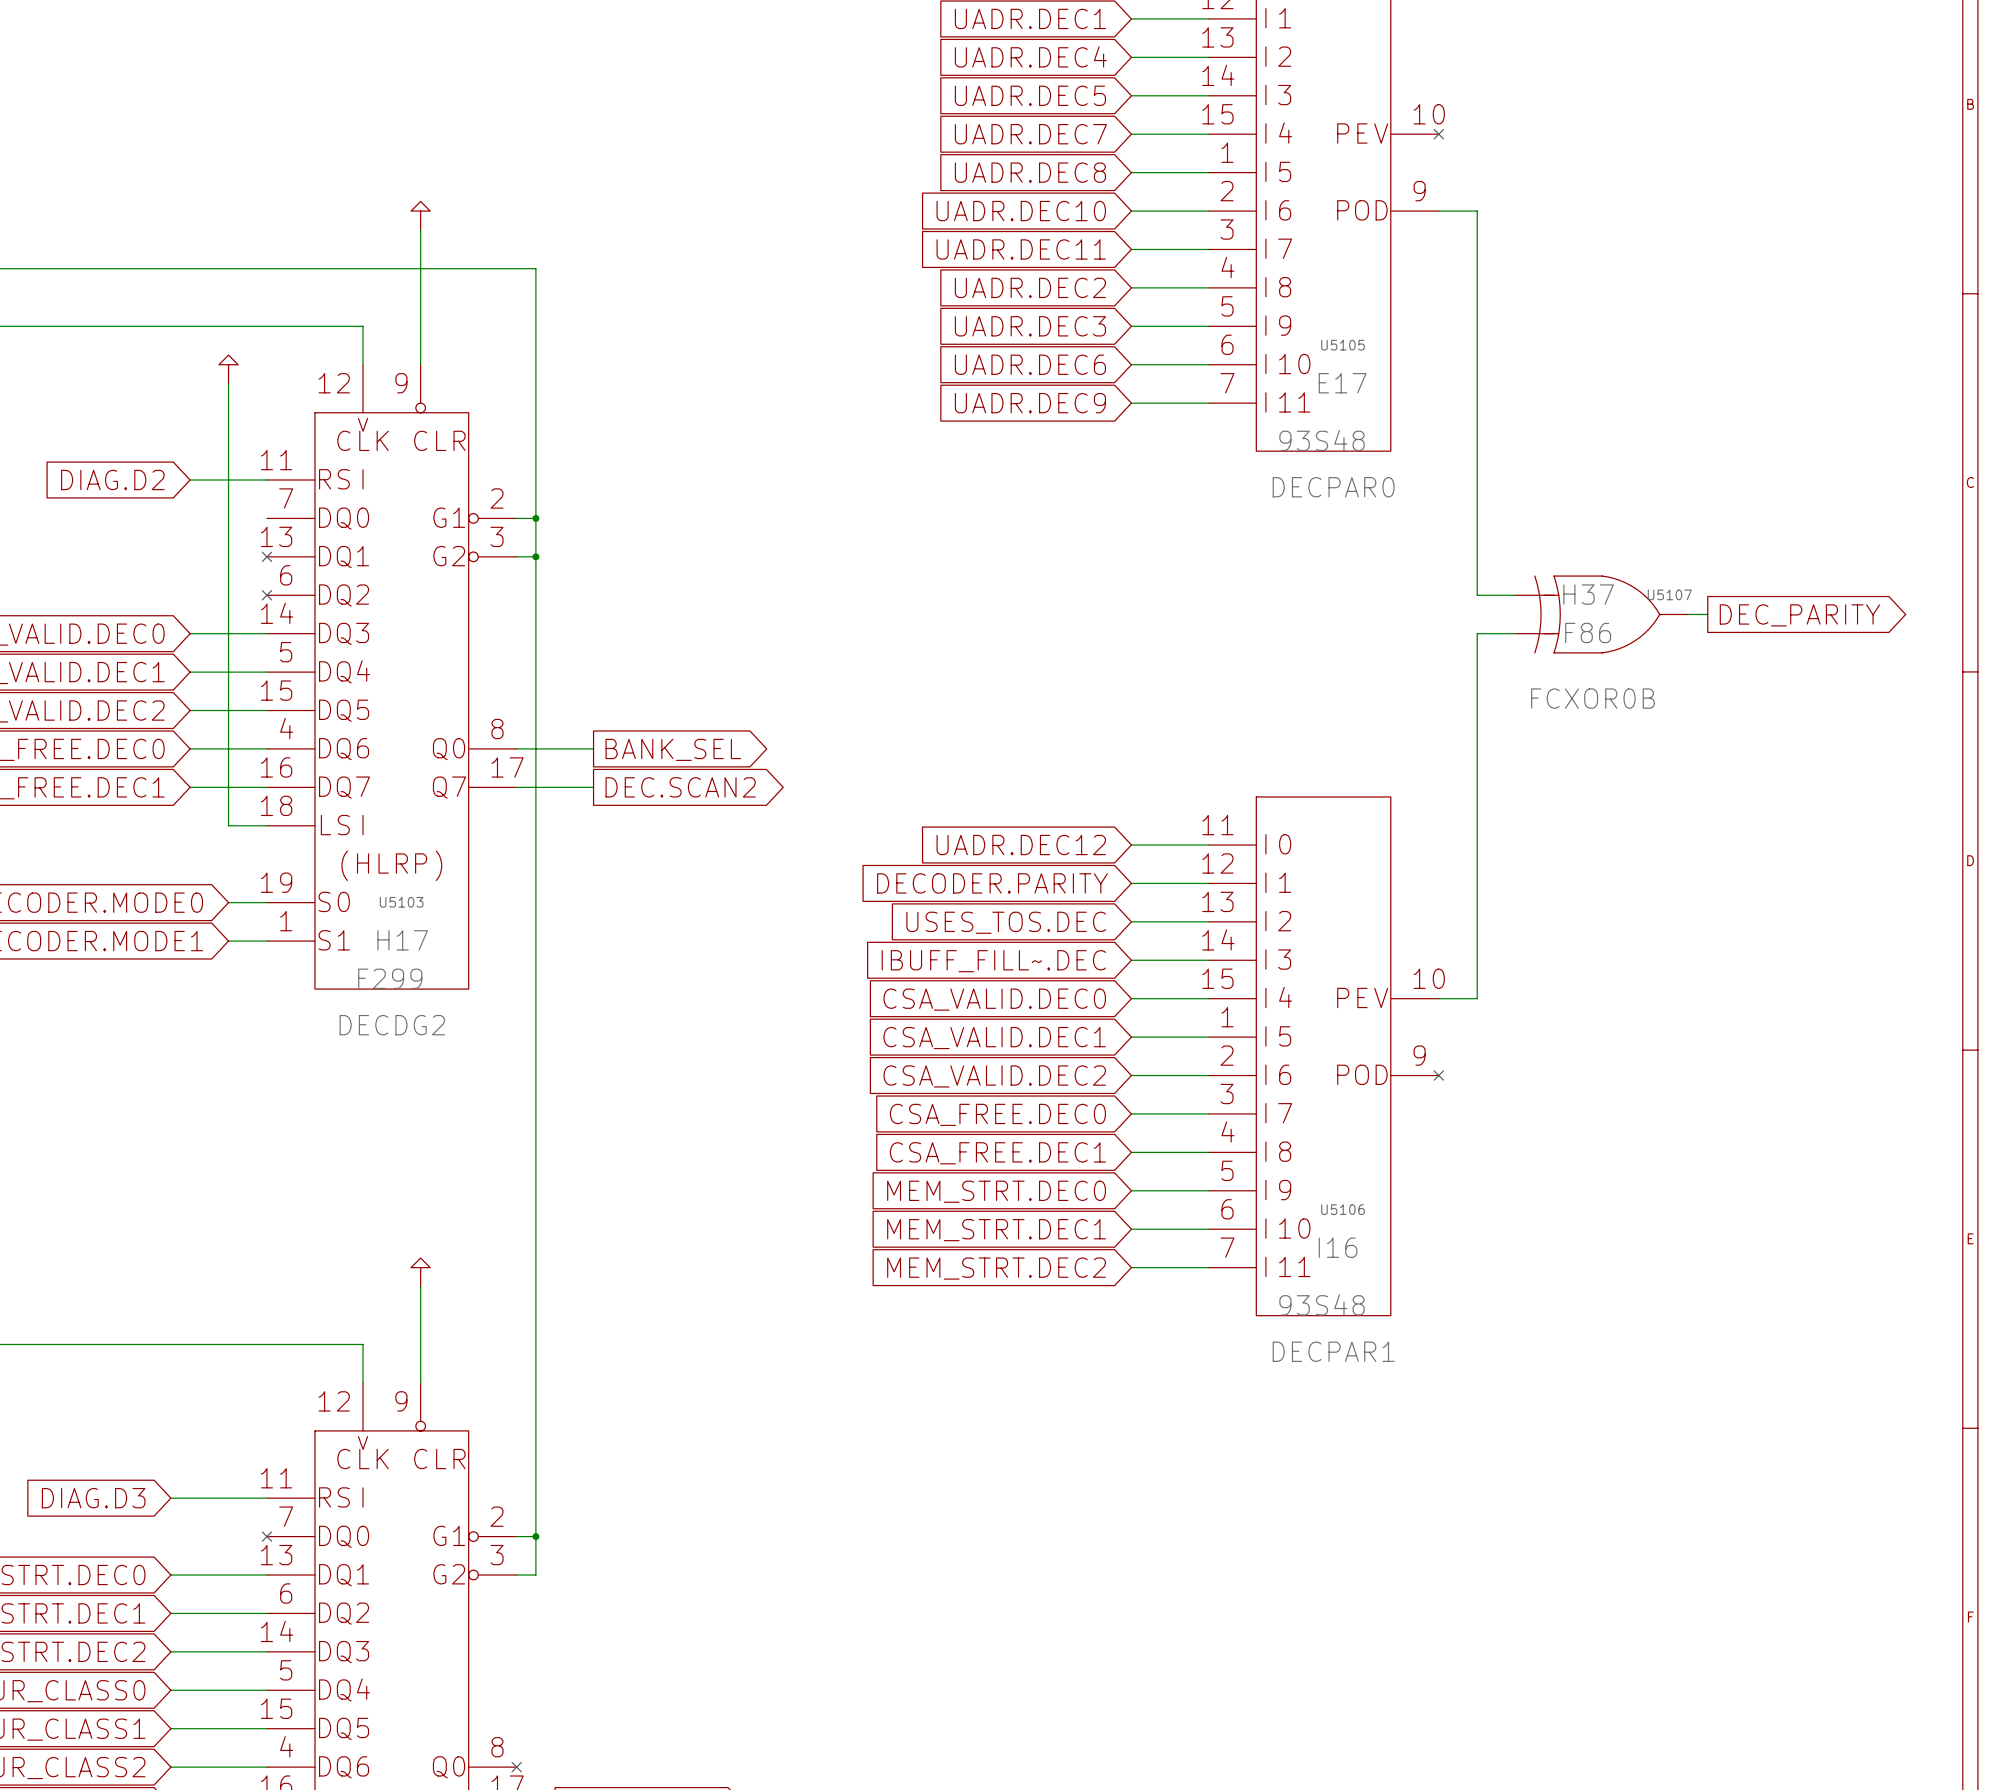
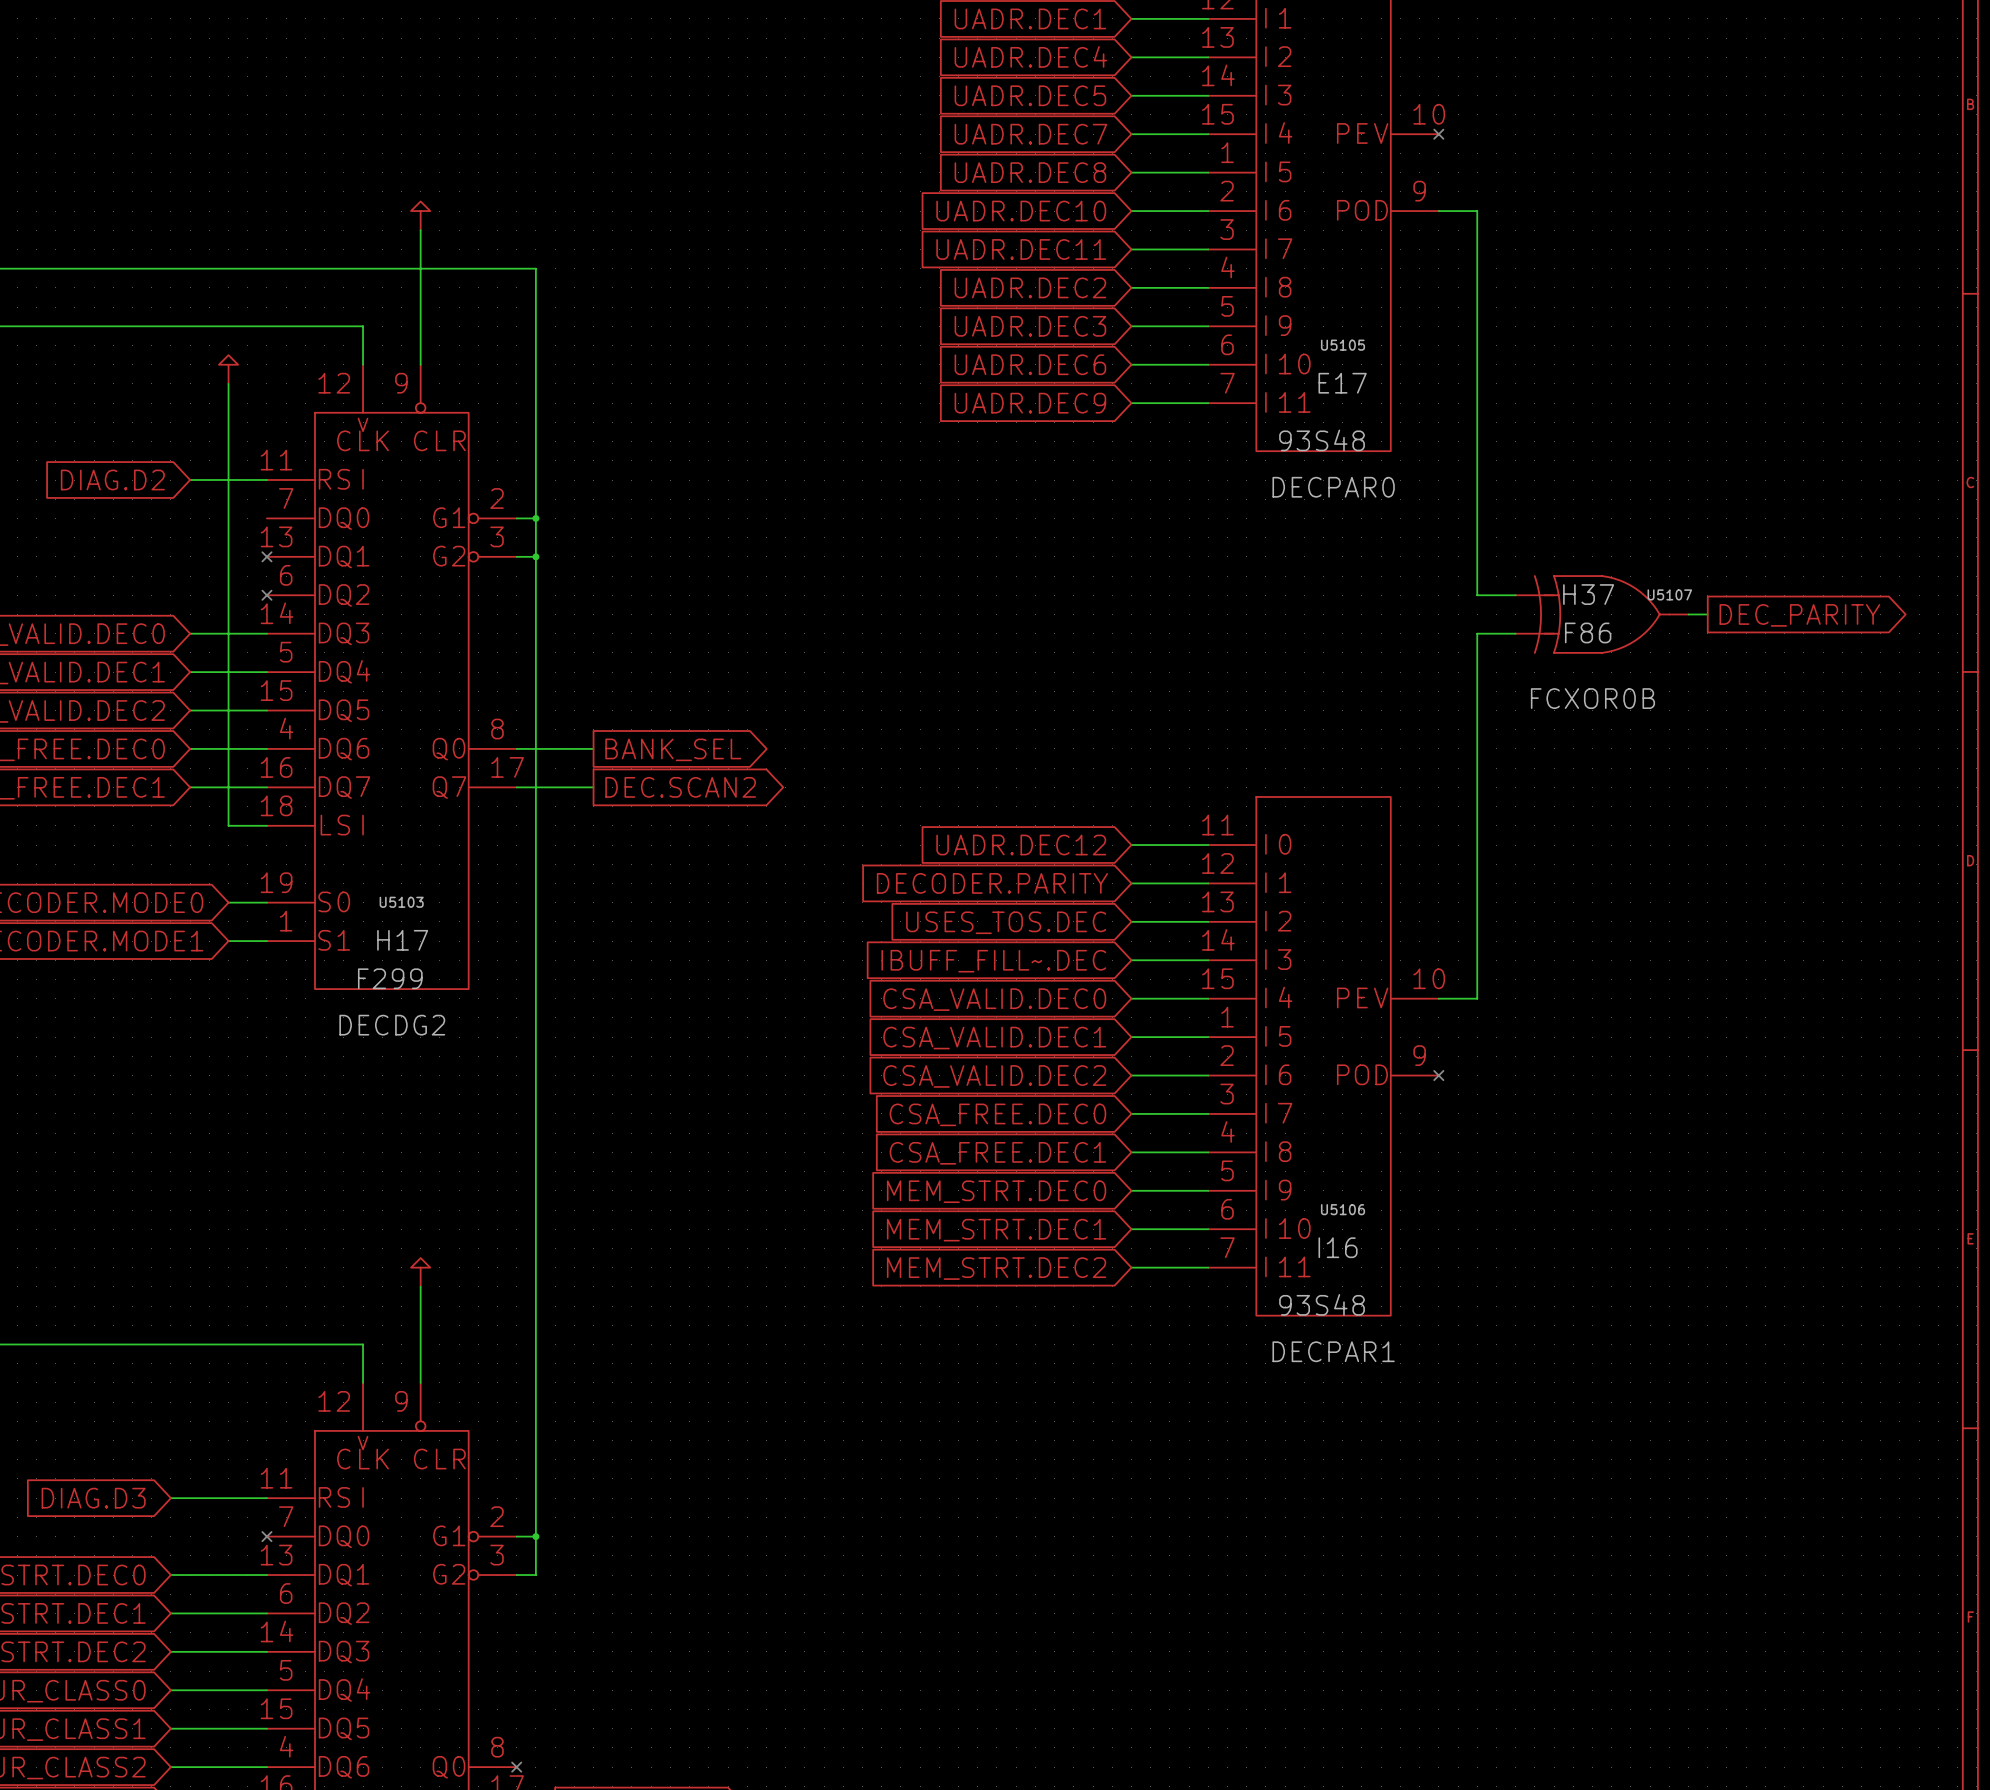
U5103 text: H (363, 863) -> none
U5103 text: L (383, 863) -> none
U5103 text: R (401, 863) -> none
U5103 text: P (421, 863) -> none
U5103 text: ( (344, 865) -> none
U5103 text: ) (438, 865) -> none

